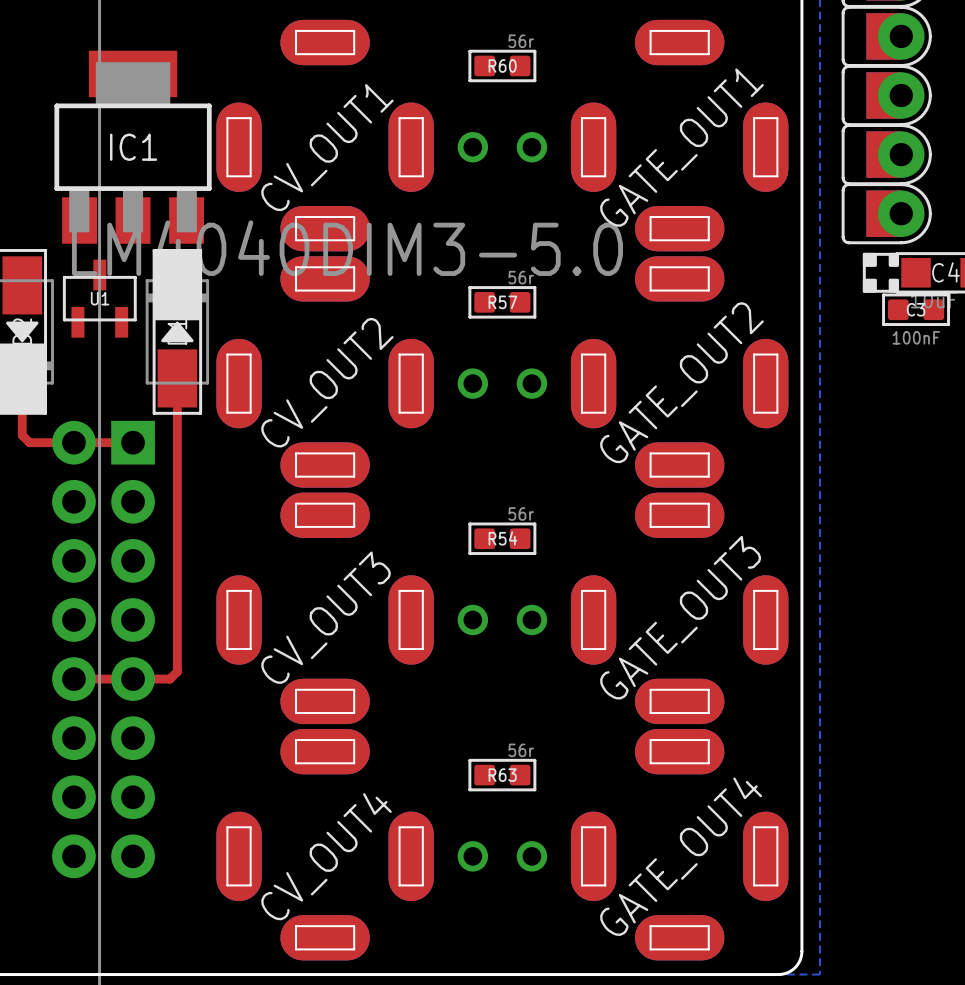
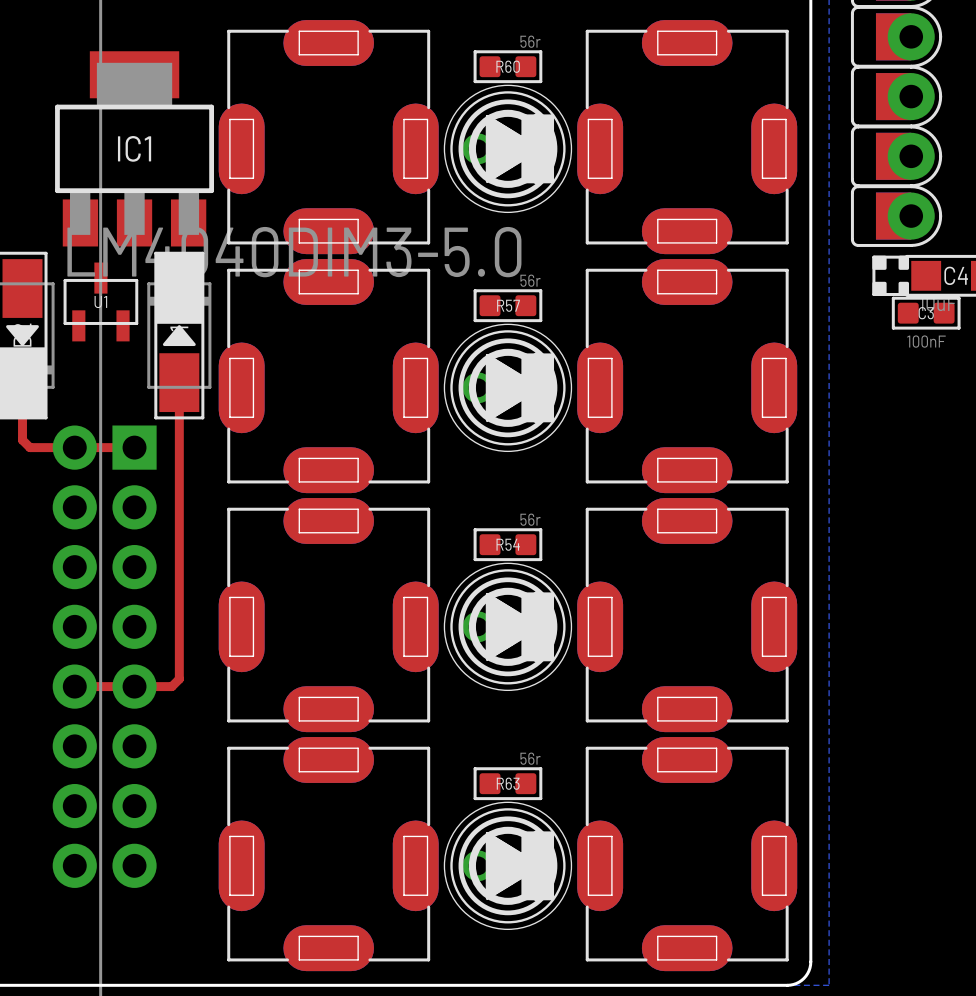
part side: bottom (325, 135) -> top (328, 137)
part side: bottom (679, 135) -> top (687, 137)
part side: bottom (502, 147) -> top (507, 148)
part side: bottom (325, 371) -> top (328, 376)
part side: bottom (679, 371) -> top (687, 376)
part side: bottom (502, 383) -> top (507, 387)
part side: bottom (325, 608) -> top (328, 615)
part side: bottom (679, 608) -> top (687, 615)
part side: bottom (502, 619) -> top (507, 626)
part side: bottom (325, 844) -> top (328, 854)
part side: bottom (679, 844) -> top (687, 854)
part side: bottom (502, 856) -> top (507, 865)

